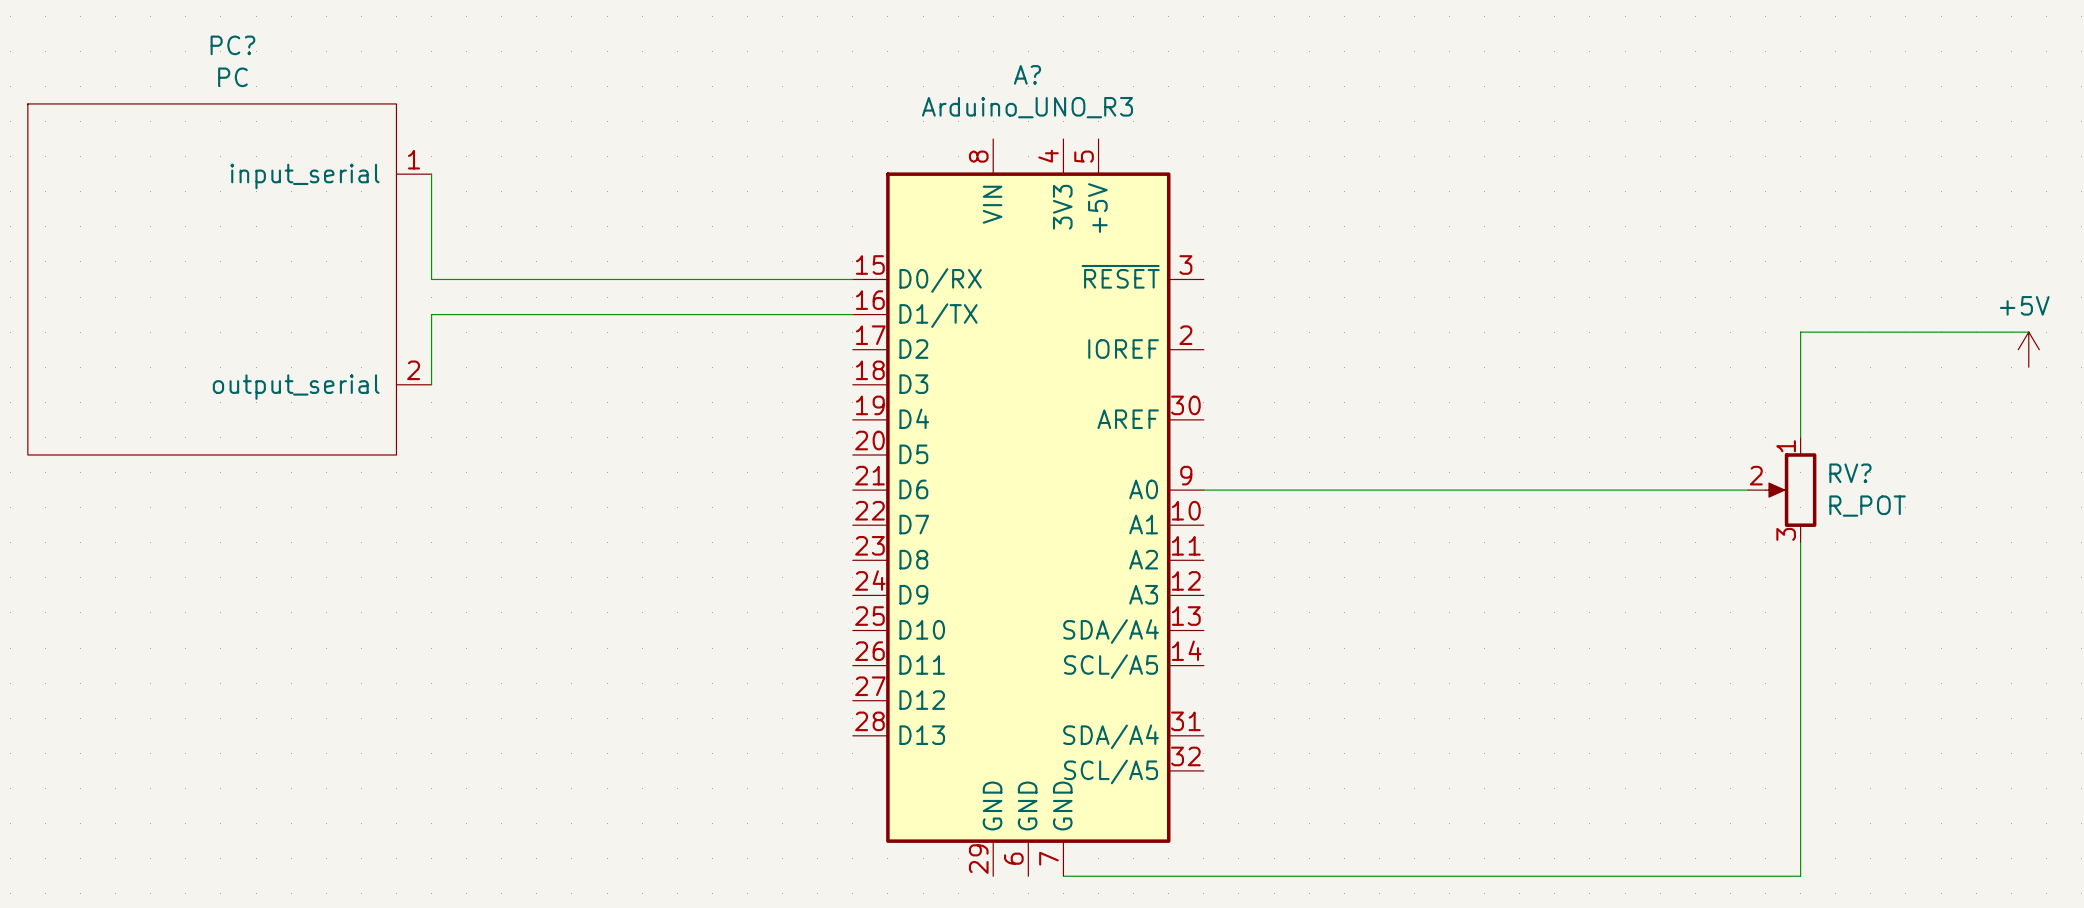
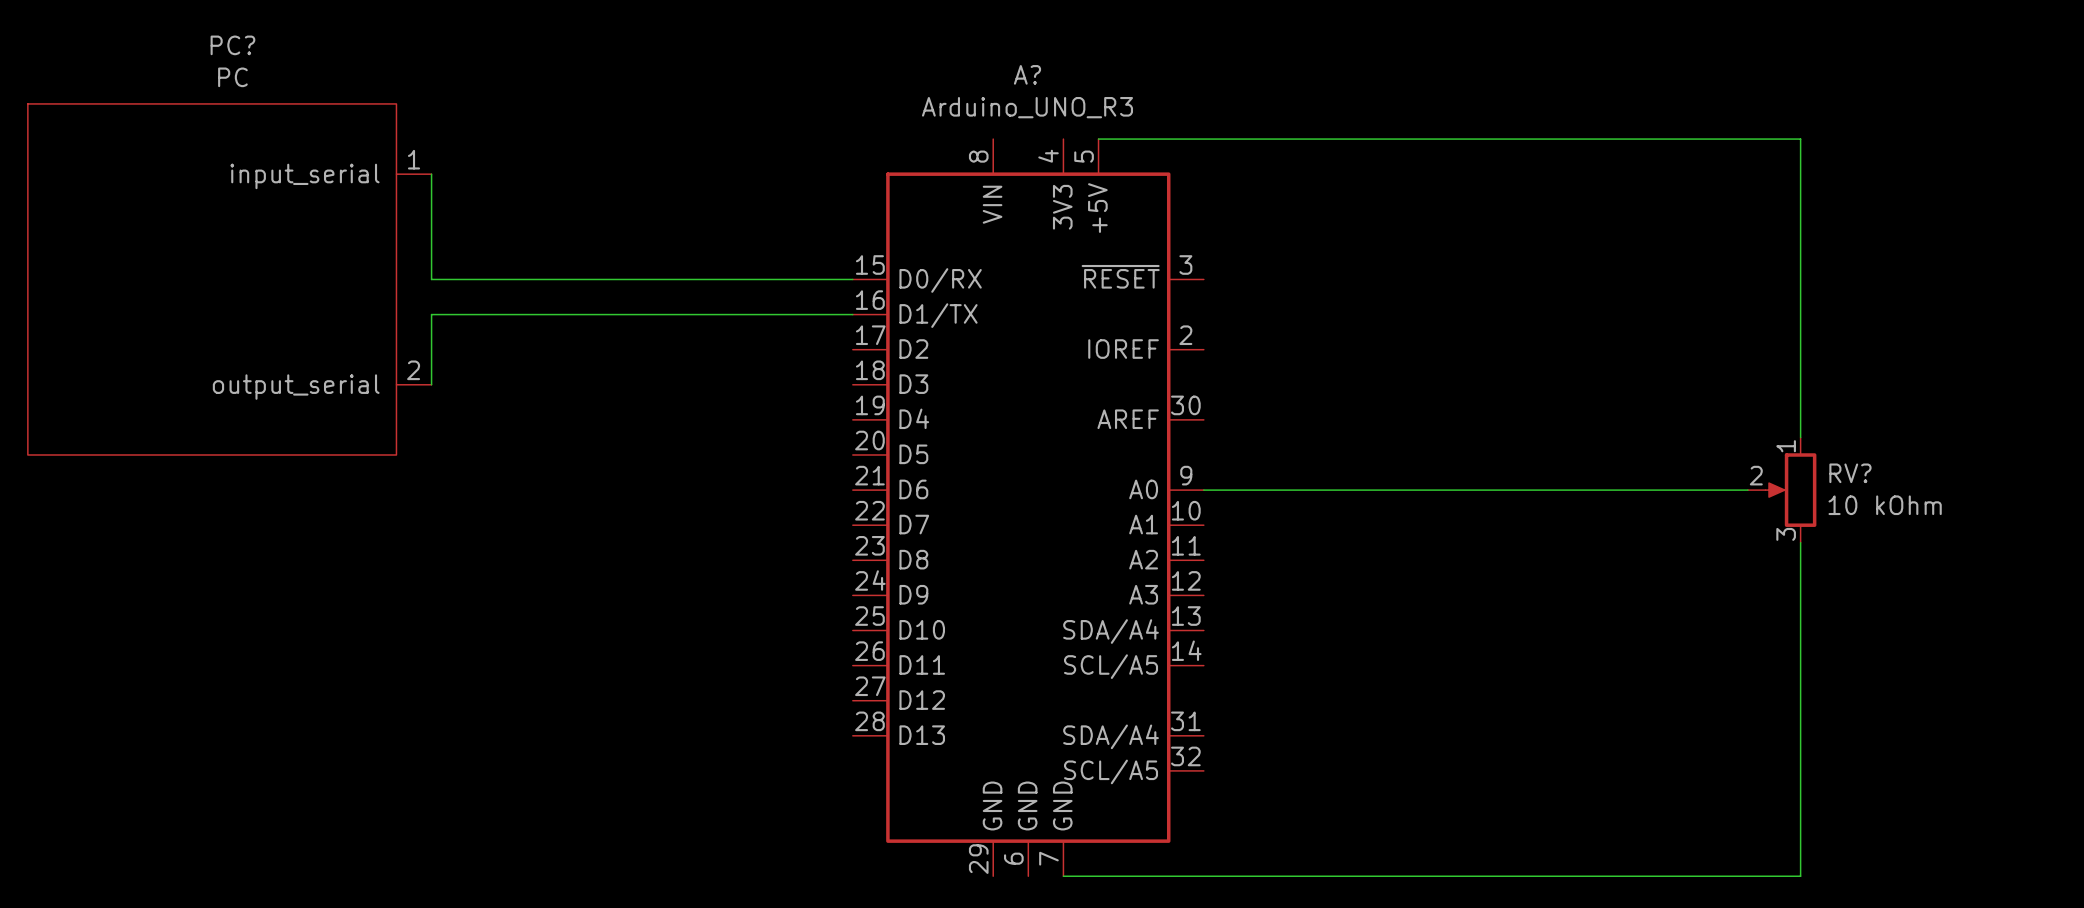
wire: (1800, 332) (2028, 332) -> (1800, 332) (1800, 139) (1098, 139)
power symbol: +5V (2028, 349) -> none
RV? value: R_POT (1867, 506) -> 10 kOhm (1885, 505)

